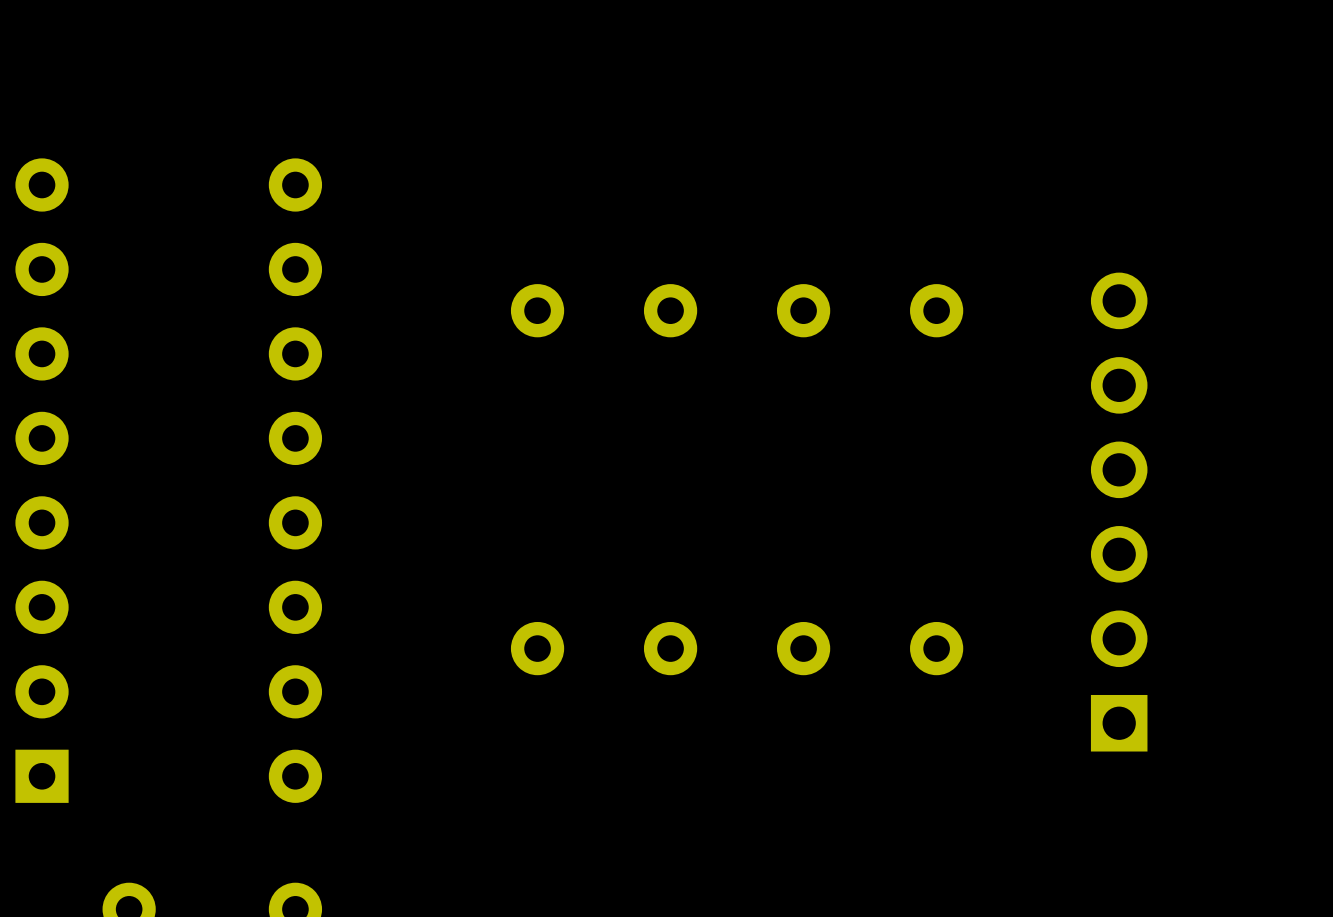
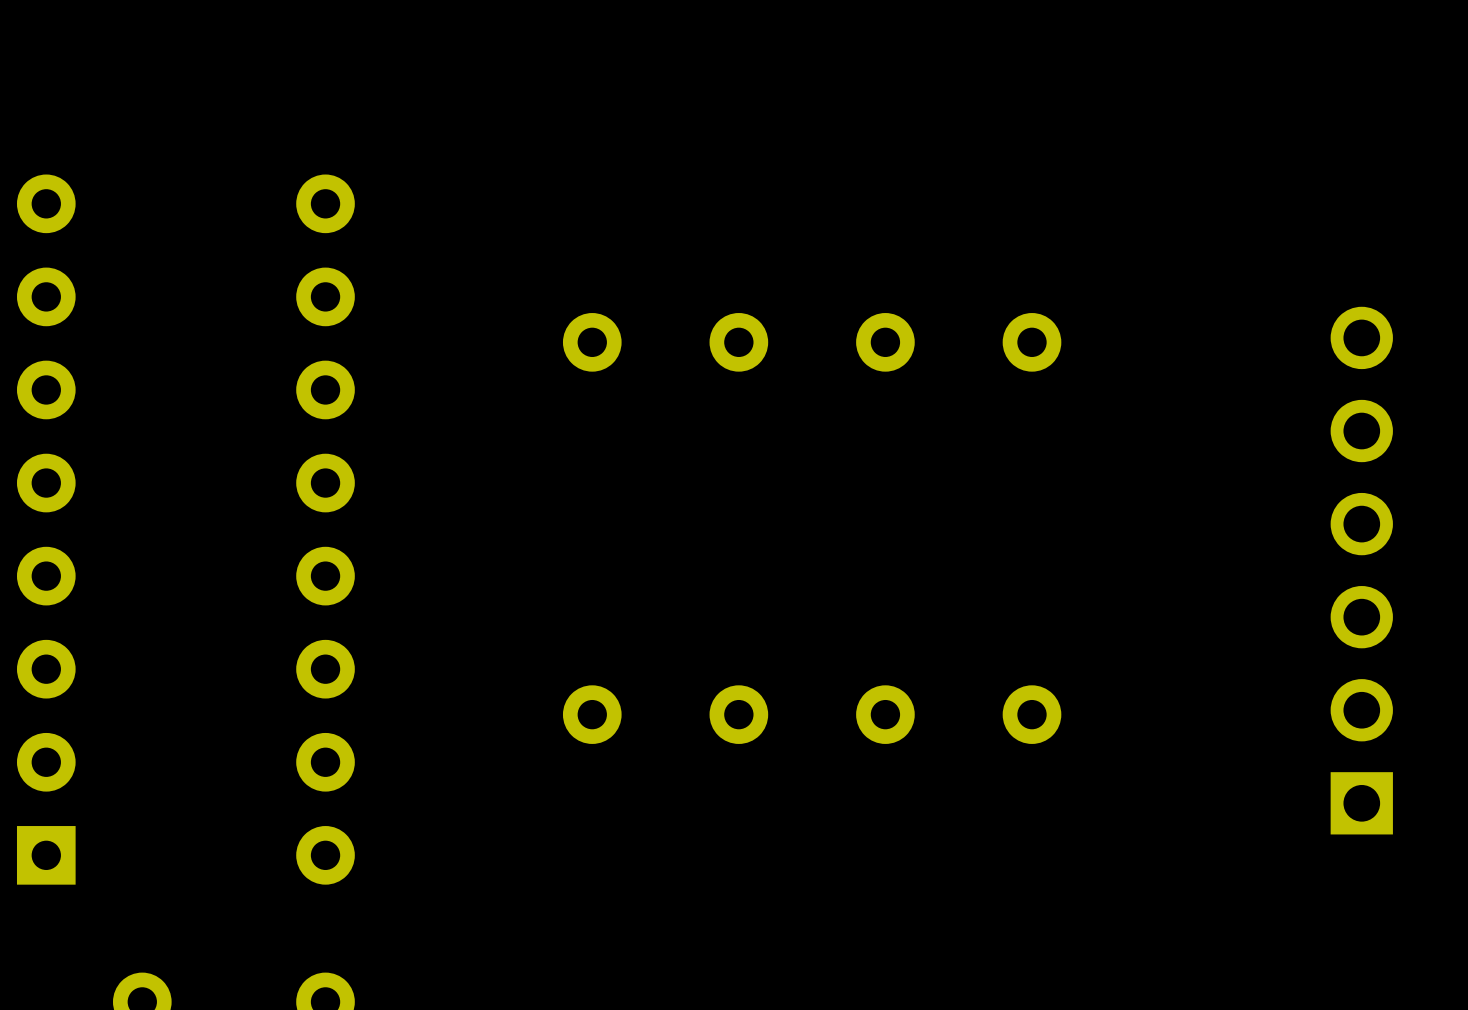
part position: (1119, 512) -> (1361, 570)

